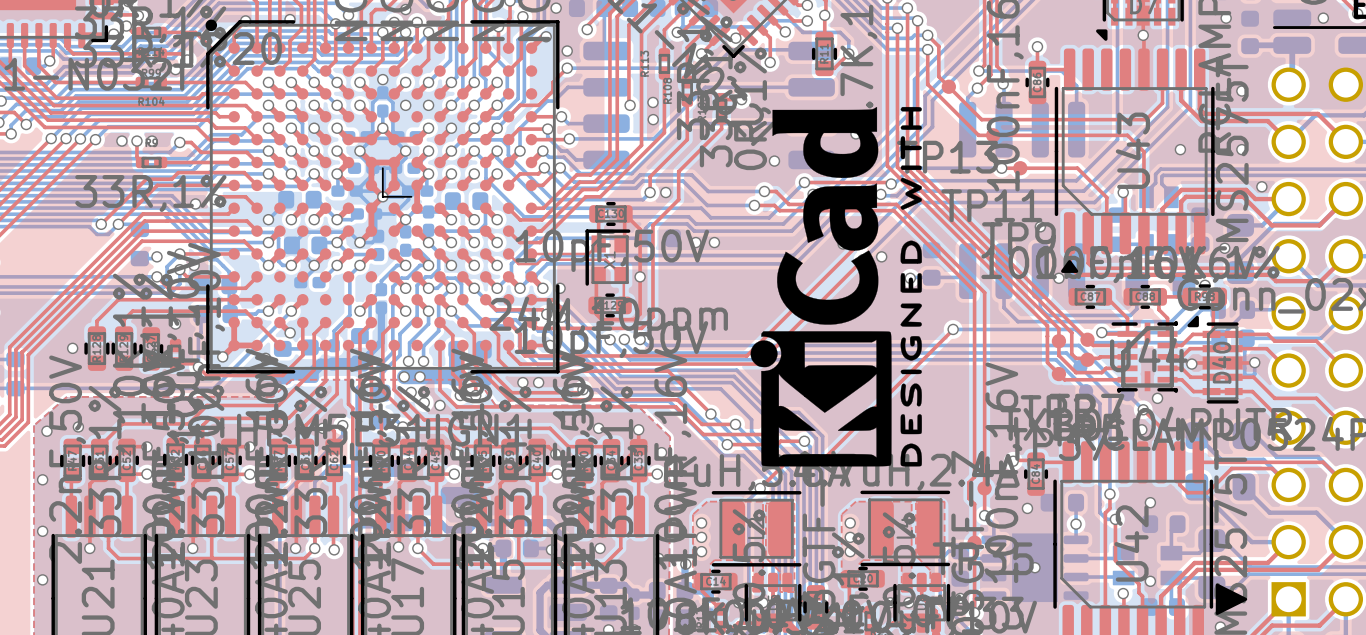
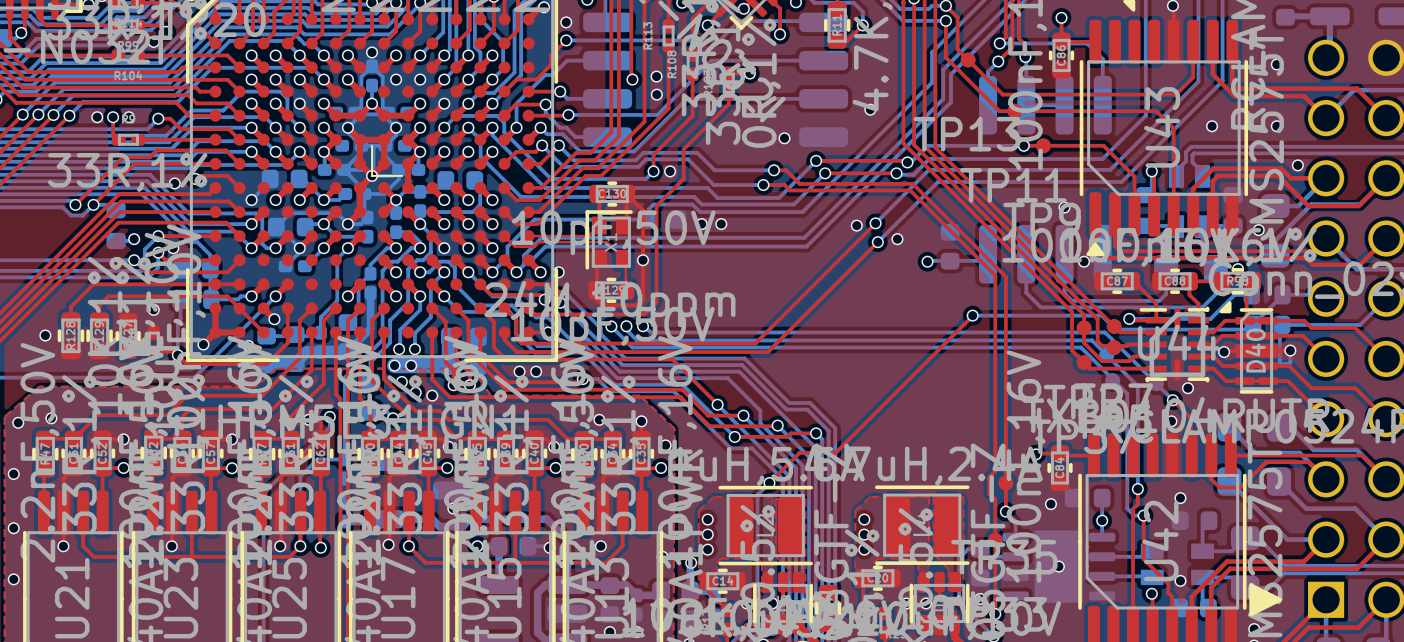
drawing: [750, 106, 922, 467] -> none

